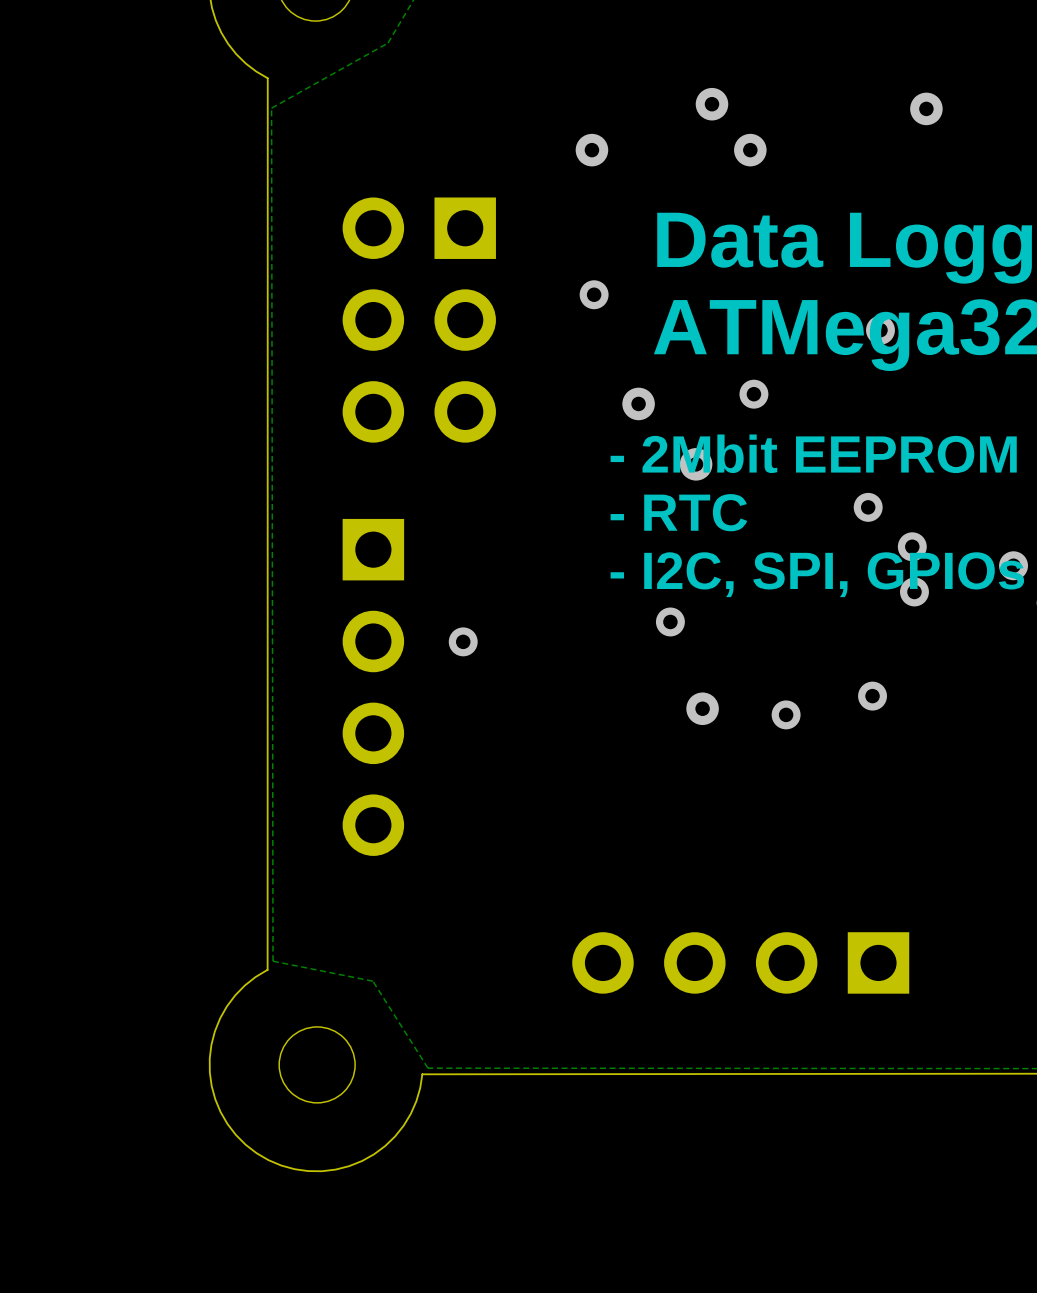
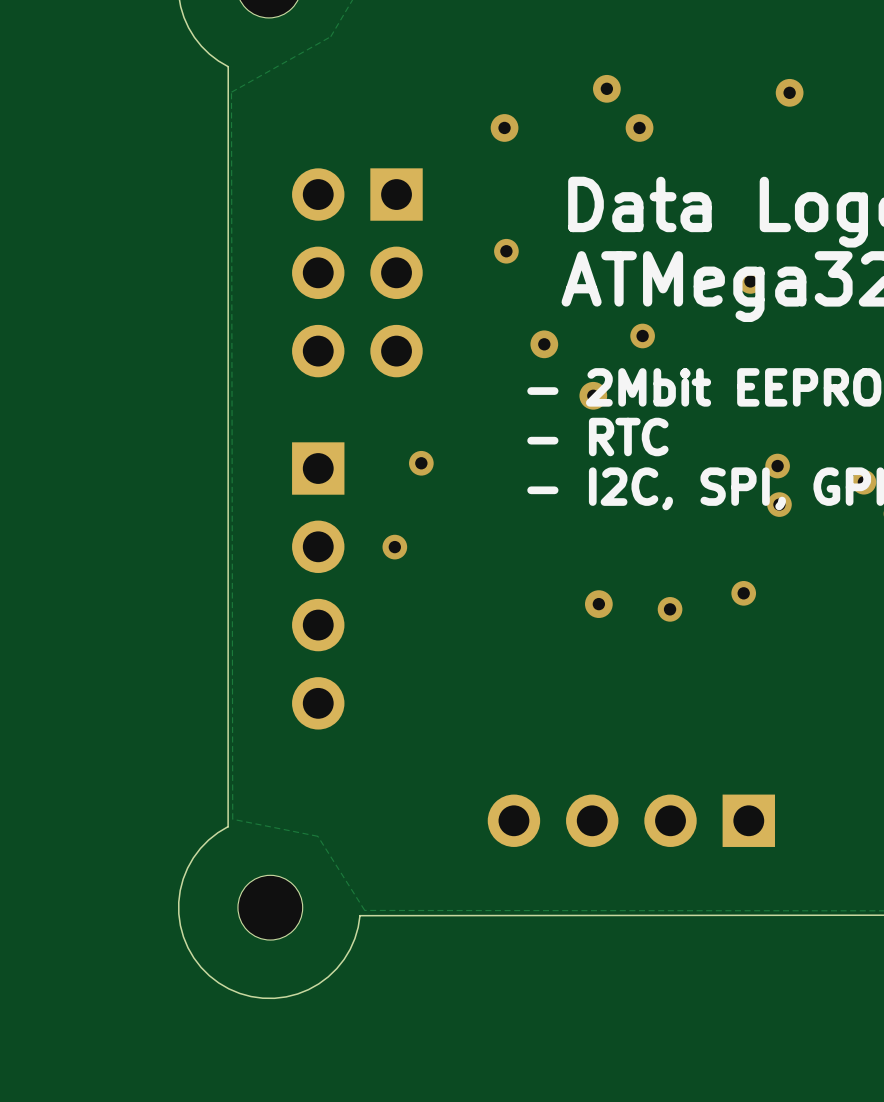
via: (868, 507) -> none
via: none -> (421, 463)
via: (670, 621) -> none

